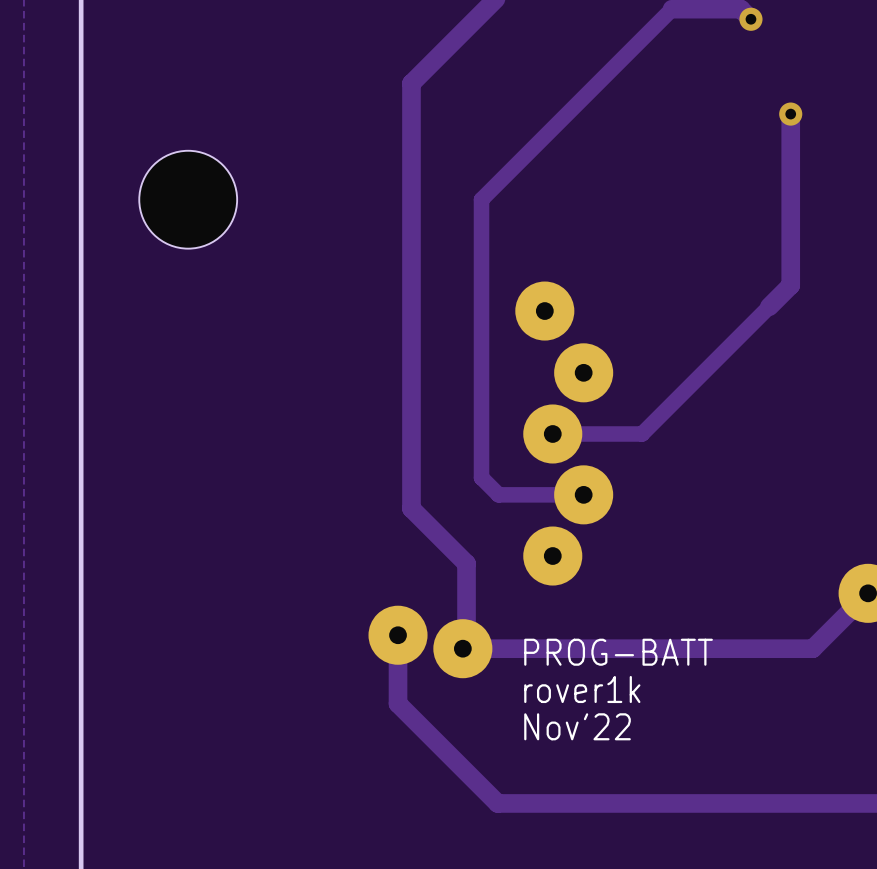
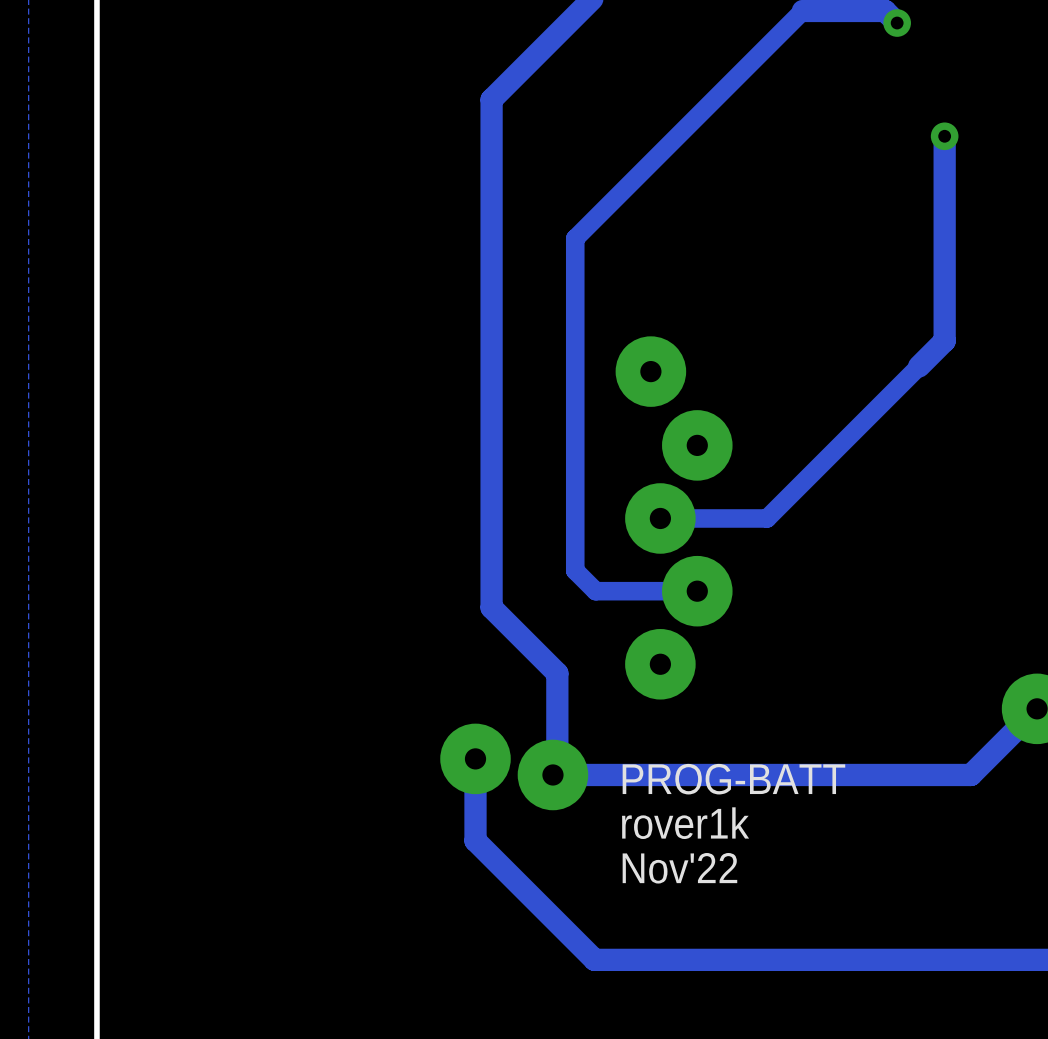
hole: (188, 199) -> none

